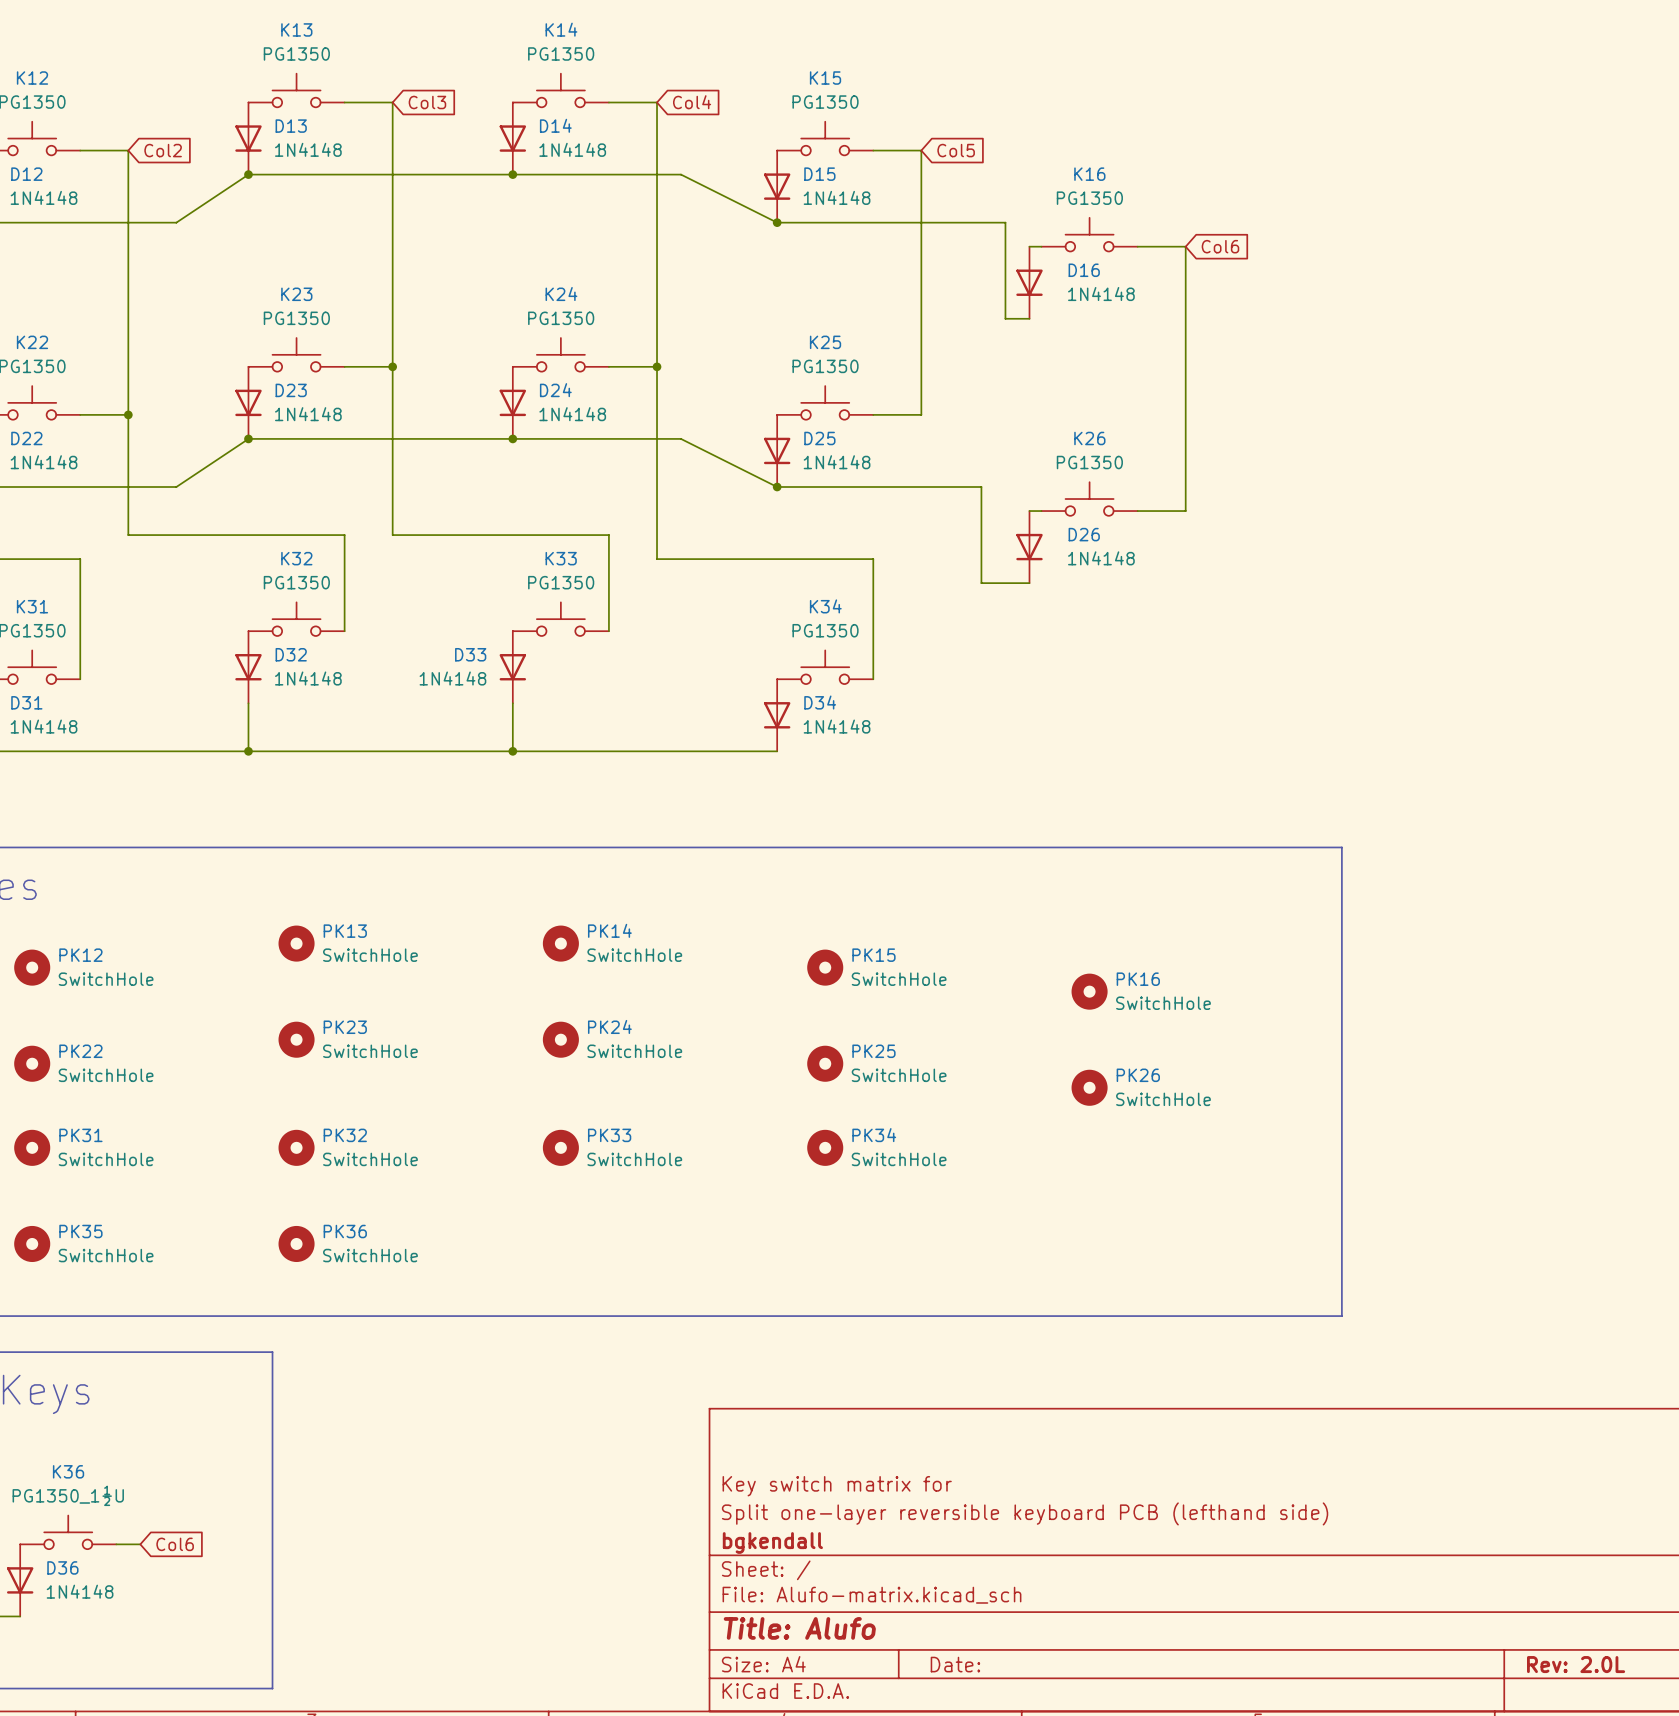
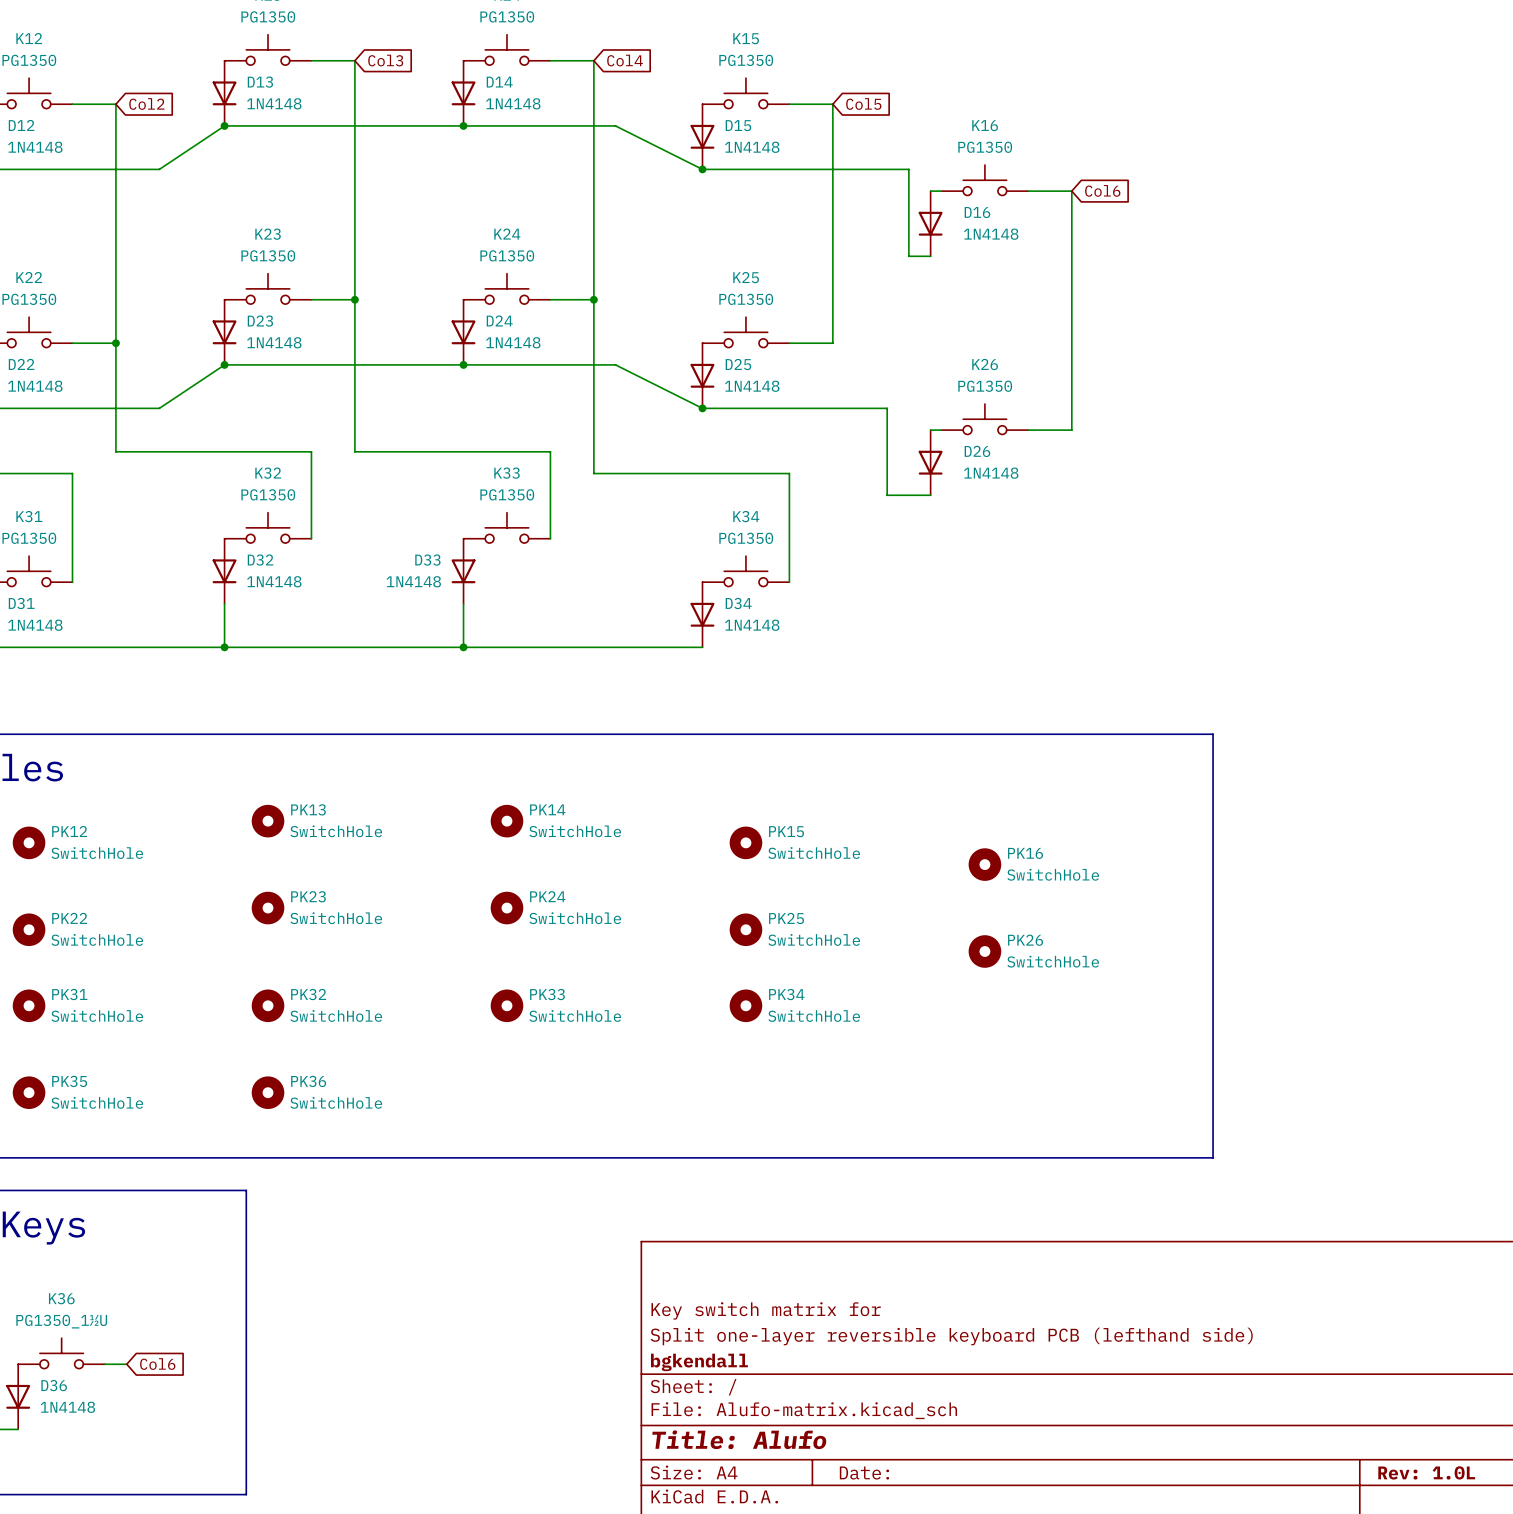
title block: Rev: 2.0L (1576, 1664) -> Rev: 1.0L (1426, 1472)

